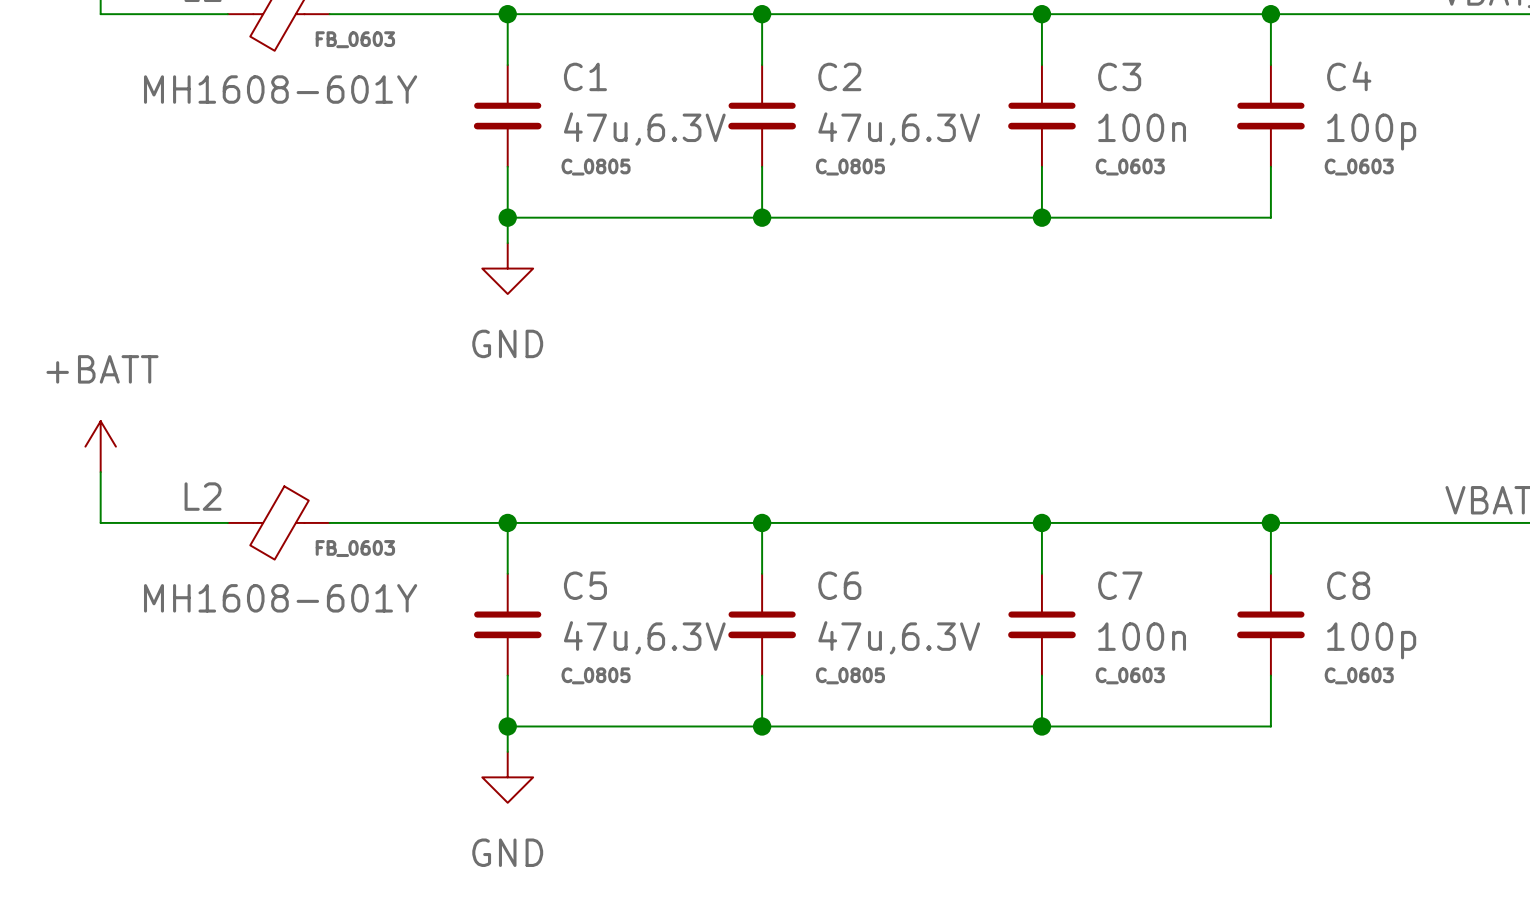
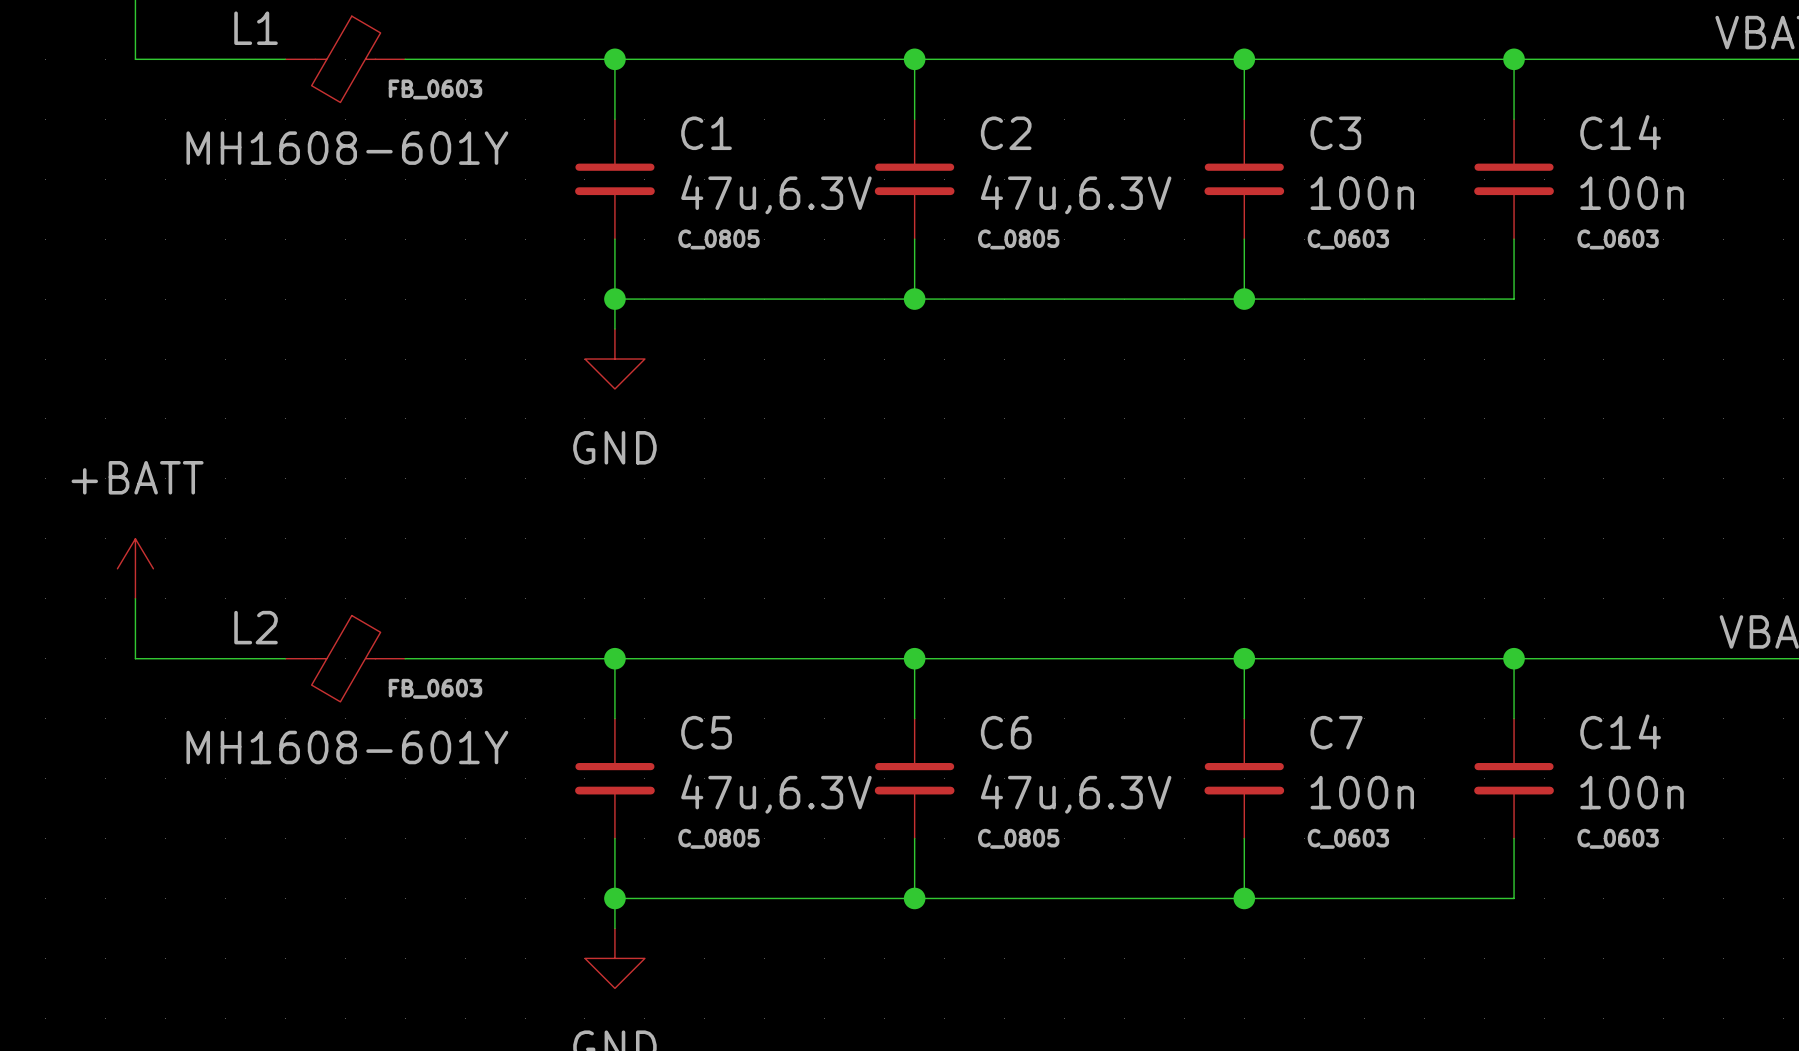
C4 name: C4 (1349, 76) -> C14 (1620, 132)
C4 value: 100p (1371, 132) -> 100n (1632, 193)
C8 name: C8 (1348, 585) -> C14 (1620, 731)
C8 value: 100p (1371, 640) -> 100n (1632, 792)

